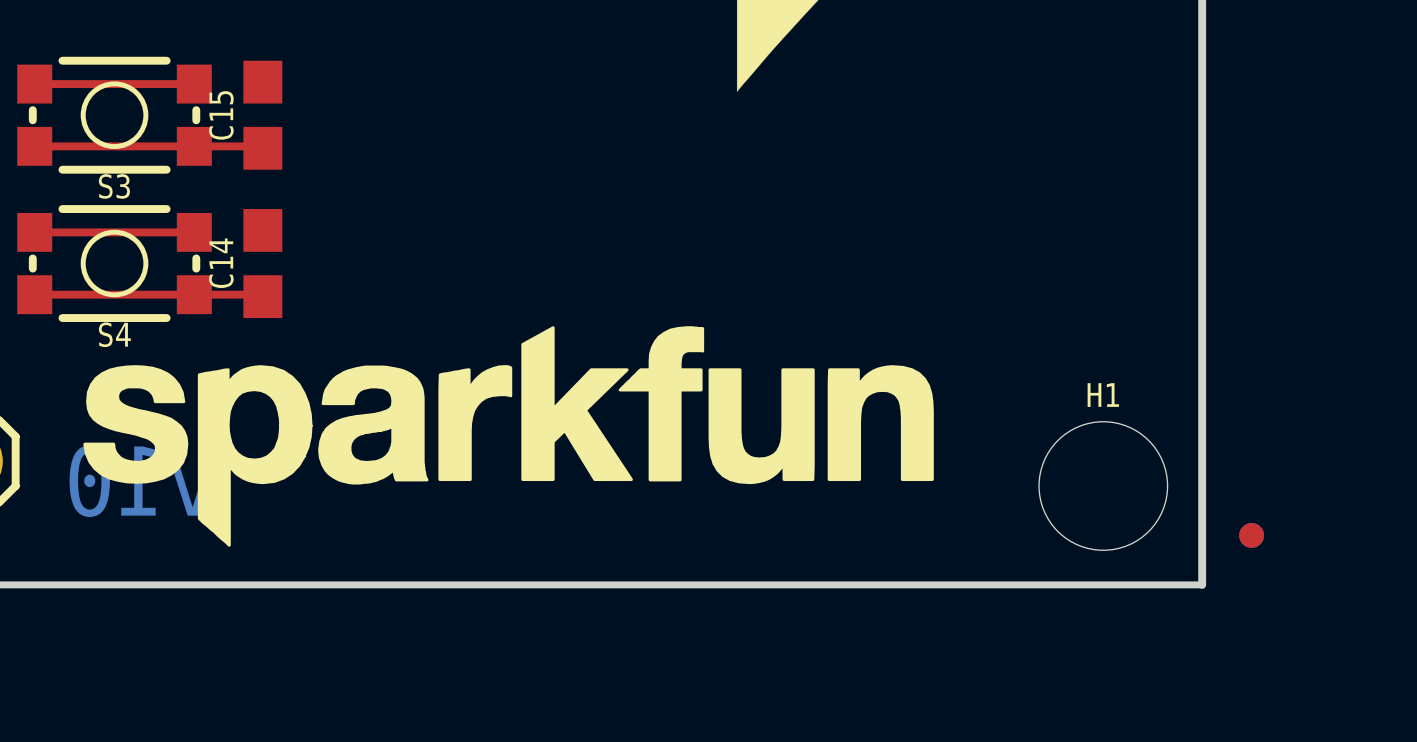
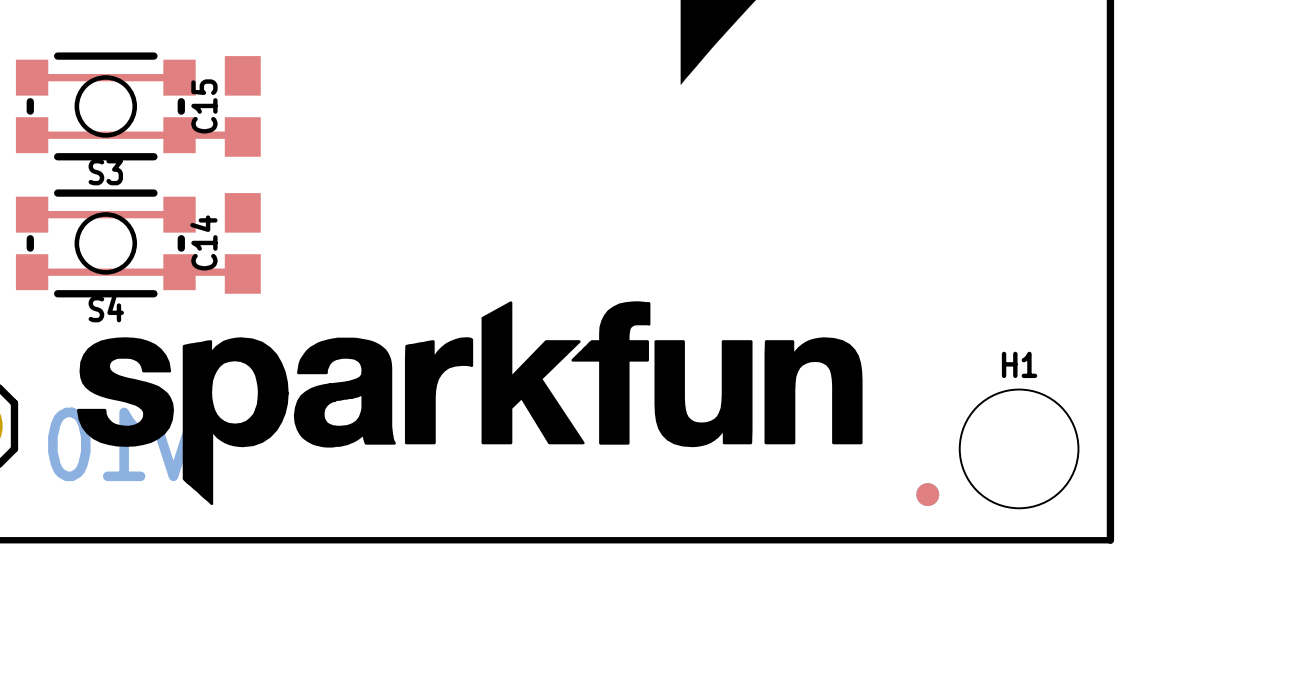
part position: (1251, 535) -> (927, 494)

